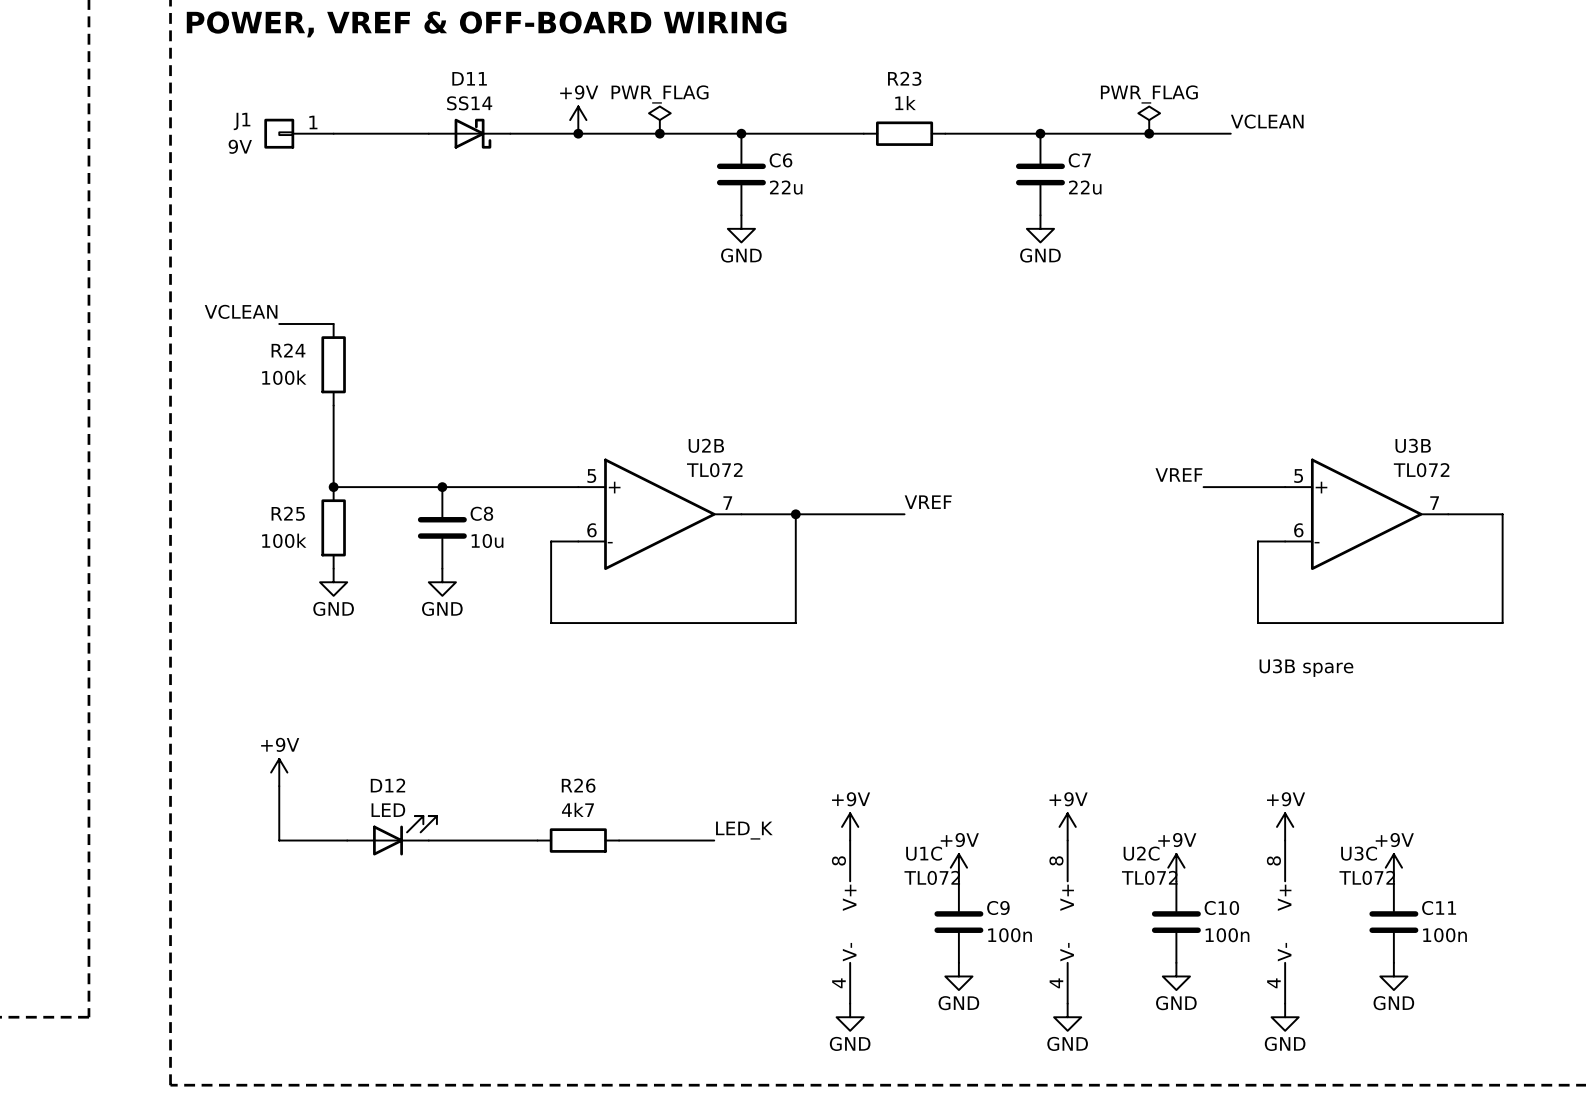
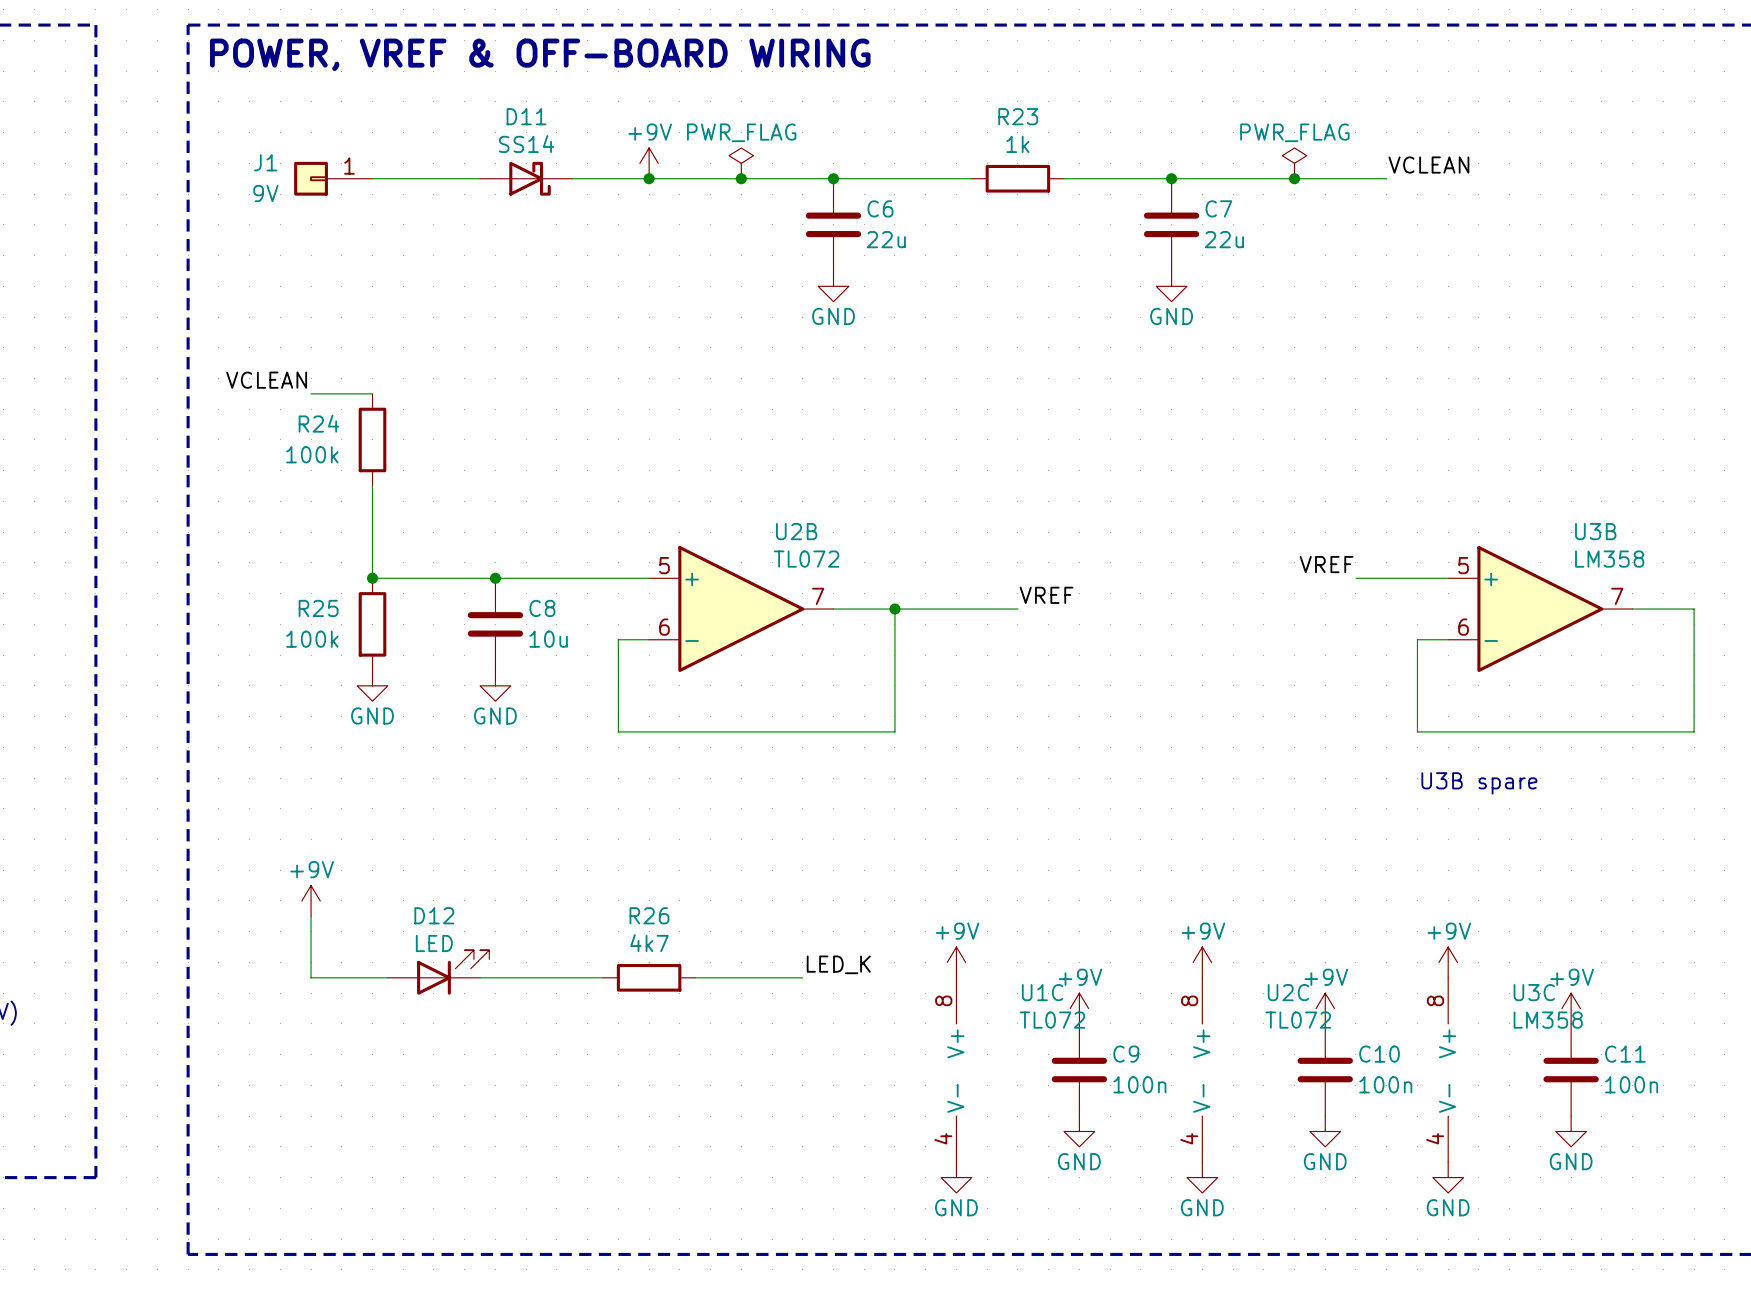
U3B value: TL072 (1421, 470) -> LM358 (1609, 559)
U3C value: TL072 (1367, 877) -> LM358 (1548, 1020)

